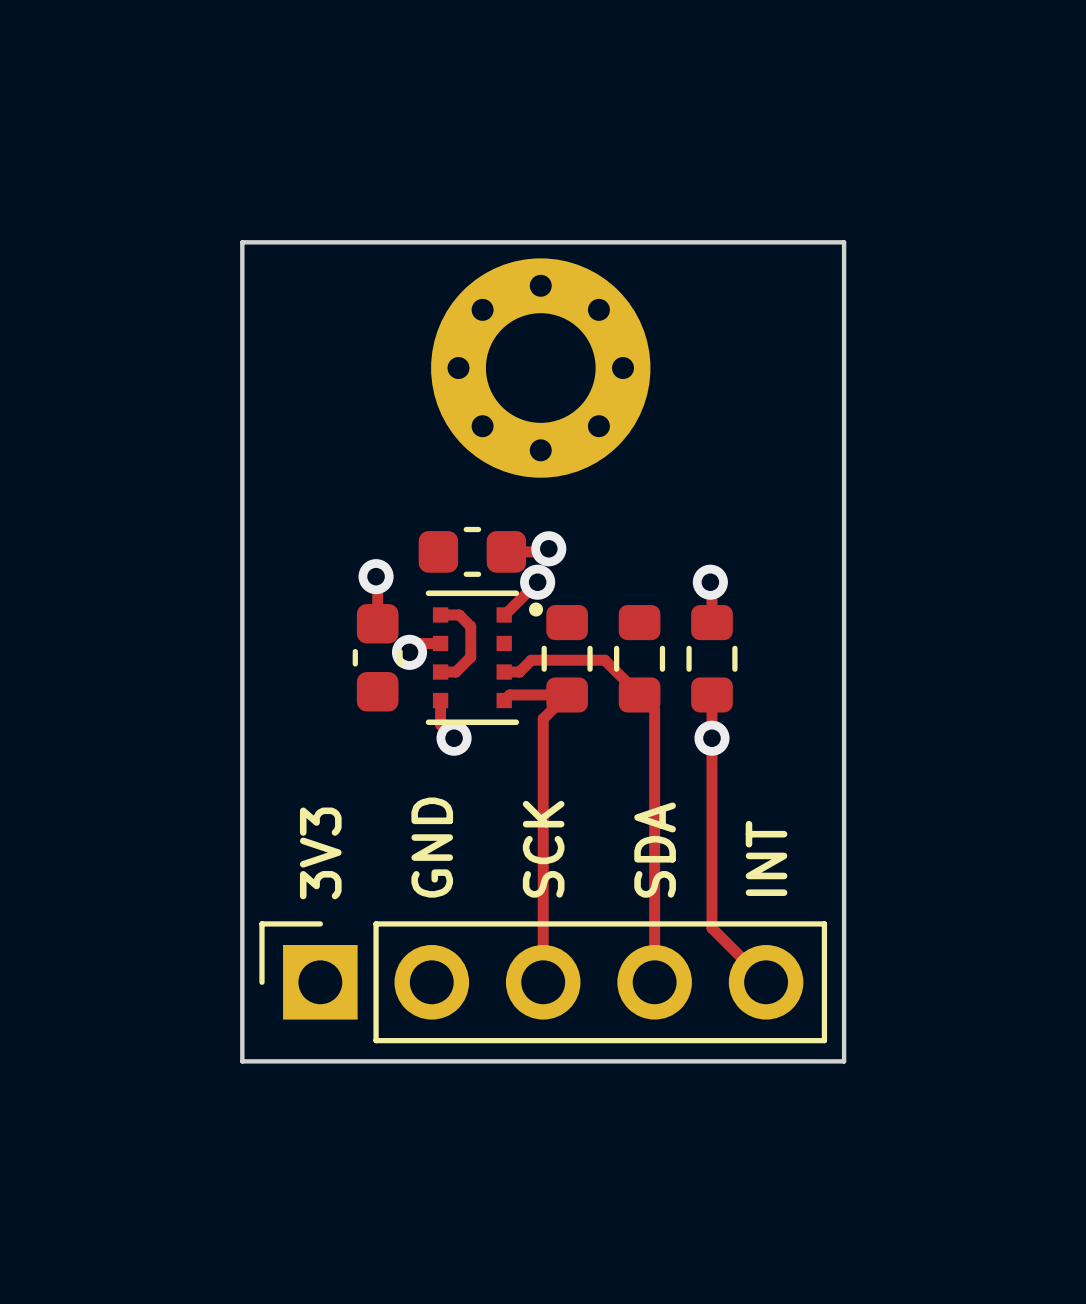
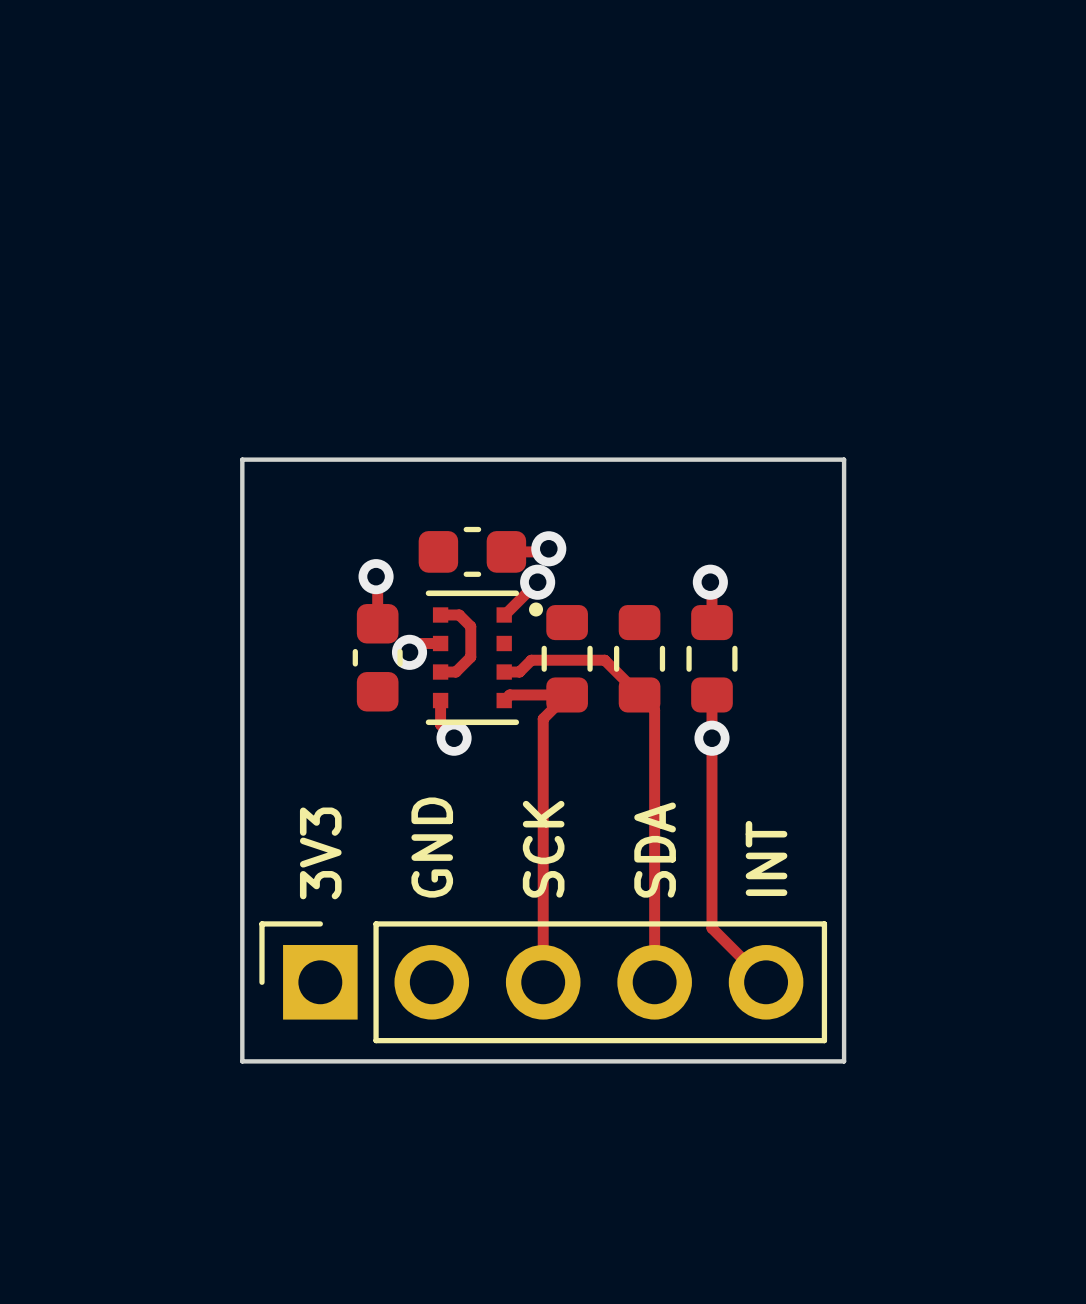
part: (540, 368) -> none
board edge: (242, 459) (242, 242) (844, 242) (844, 459) -> (242, 459) (844, 459)

